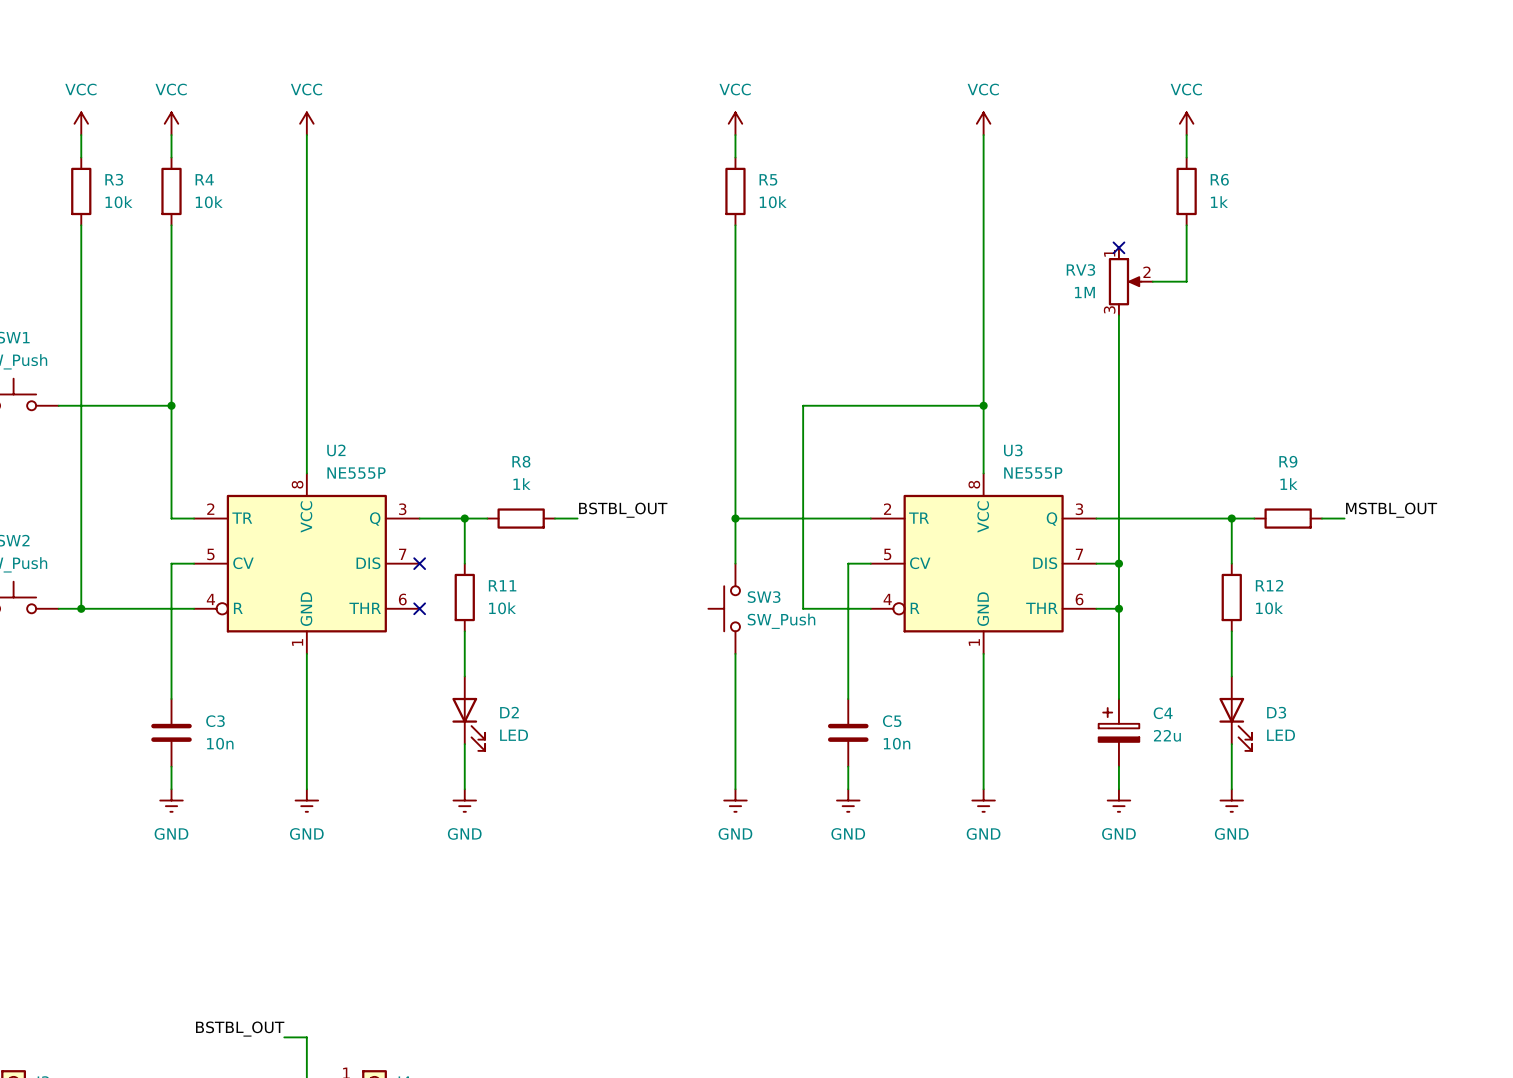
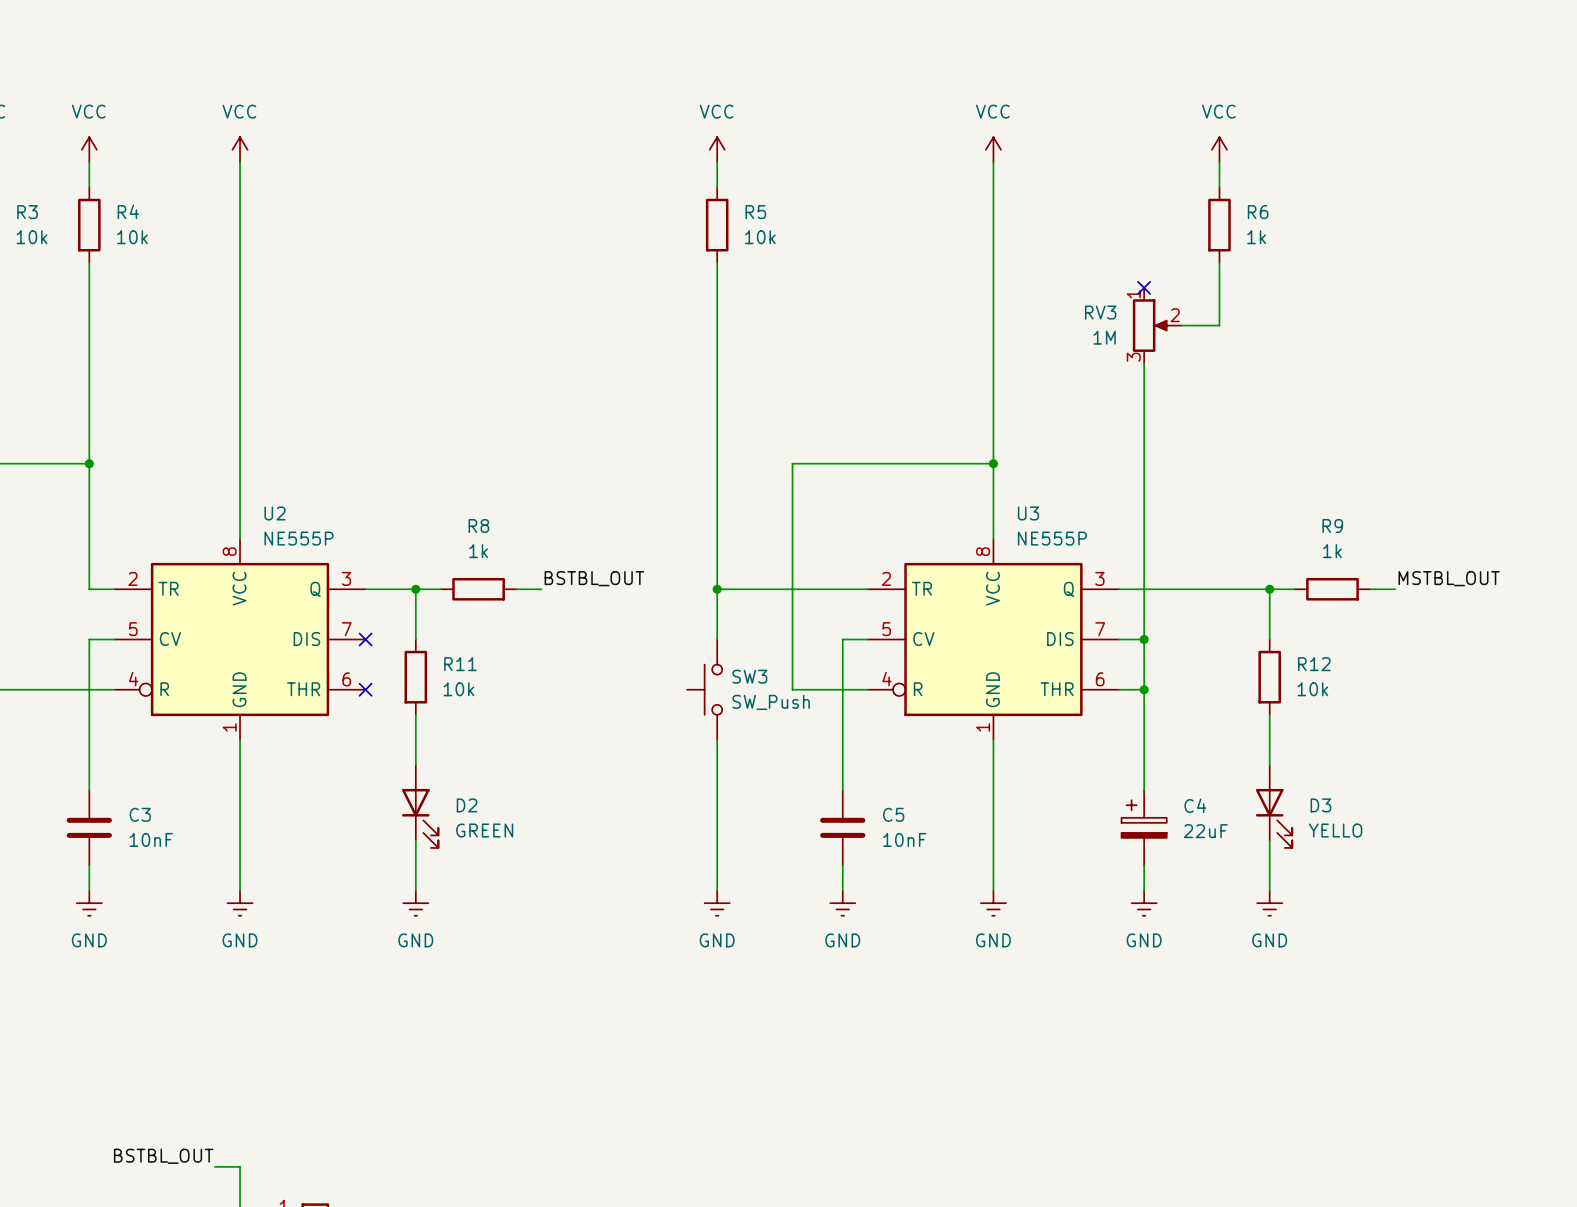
D2 value: LED (514, 735) -> GREEN (484, 830)
C4 value: 22u (1167, 735) -> 22uF (1205, 831)
D3 value: LED (1281, 735) -> YELLO (1335, 830)
C3 value: 10n (220, 743) -> 10nF (151, 839)
C5 value: 10n (897, 743) -> 10nF (904, 839)

